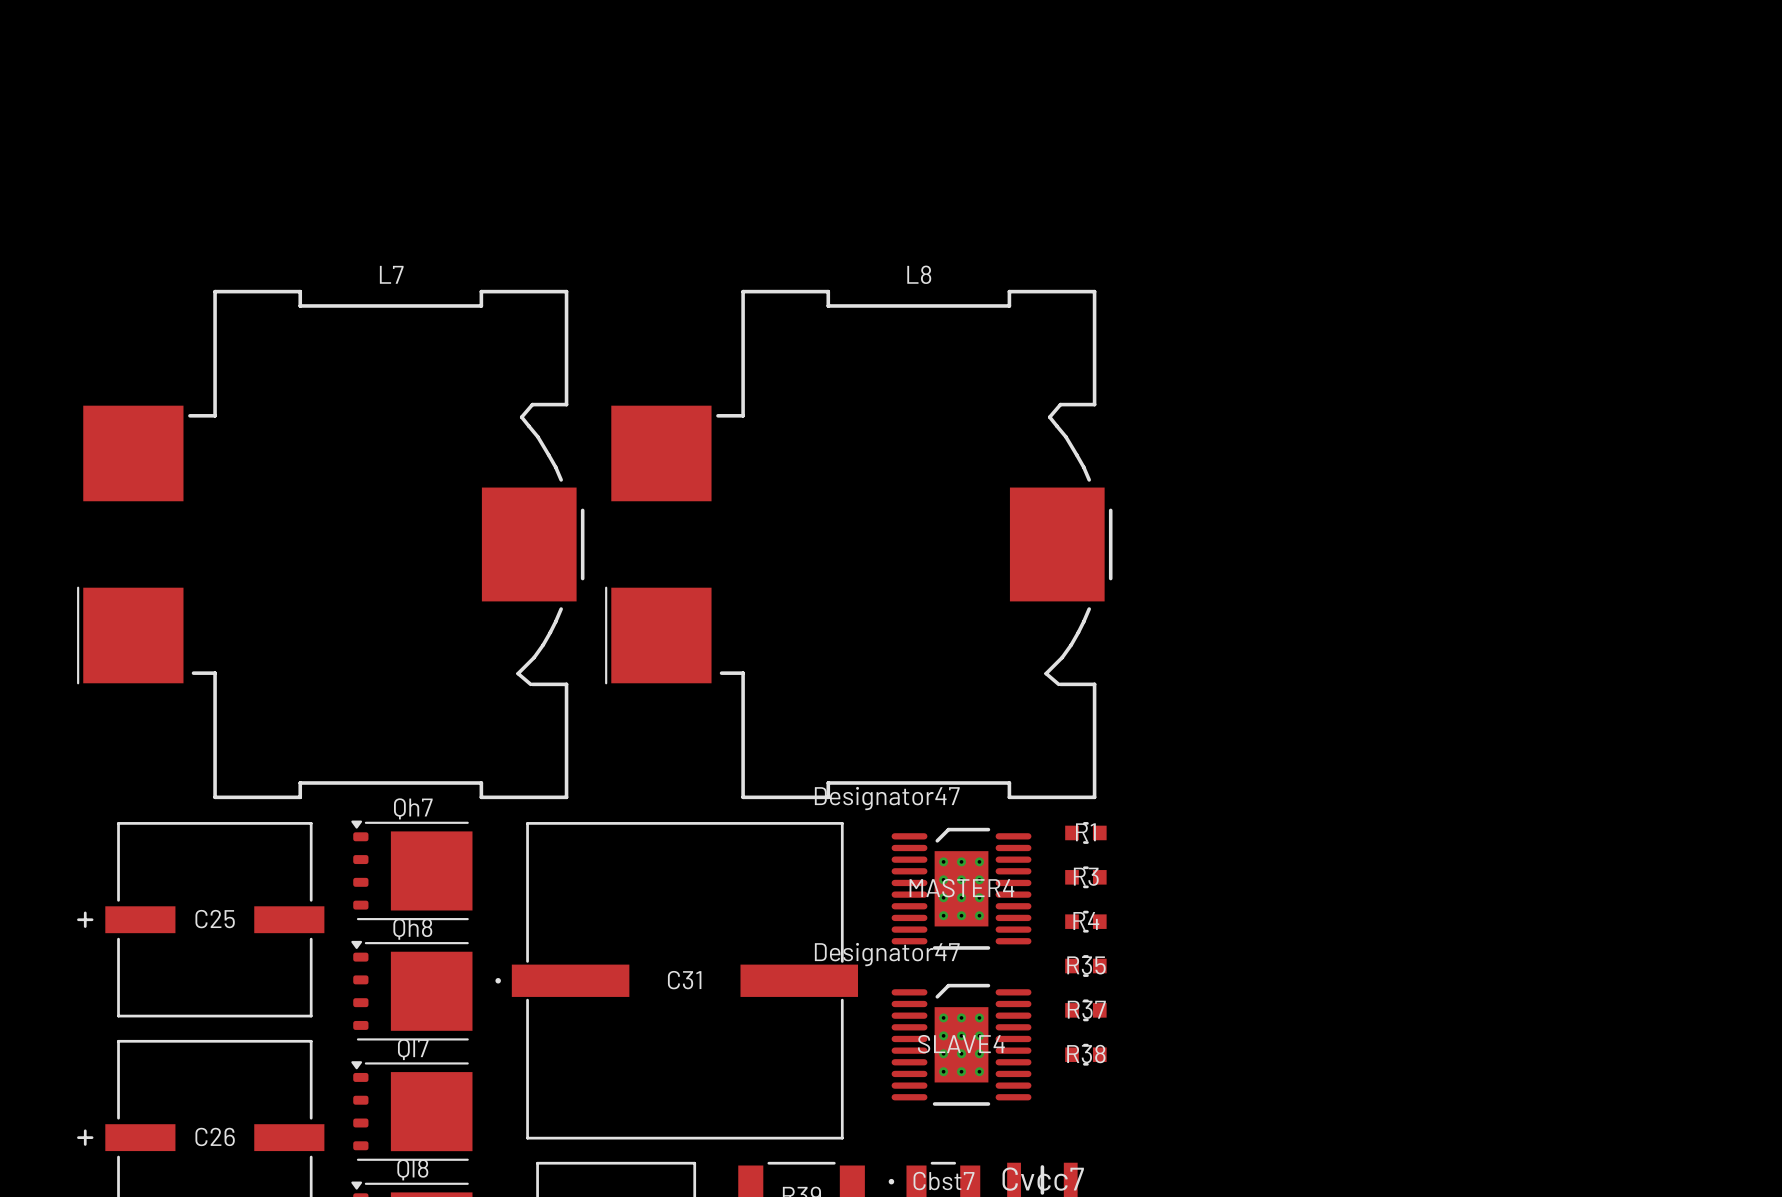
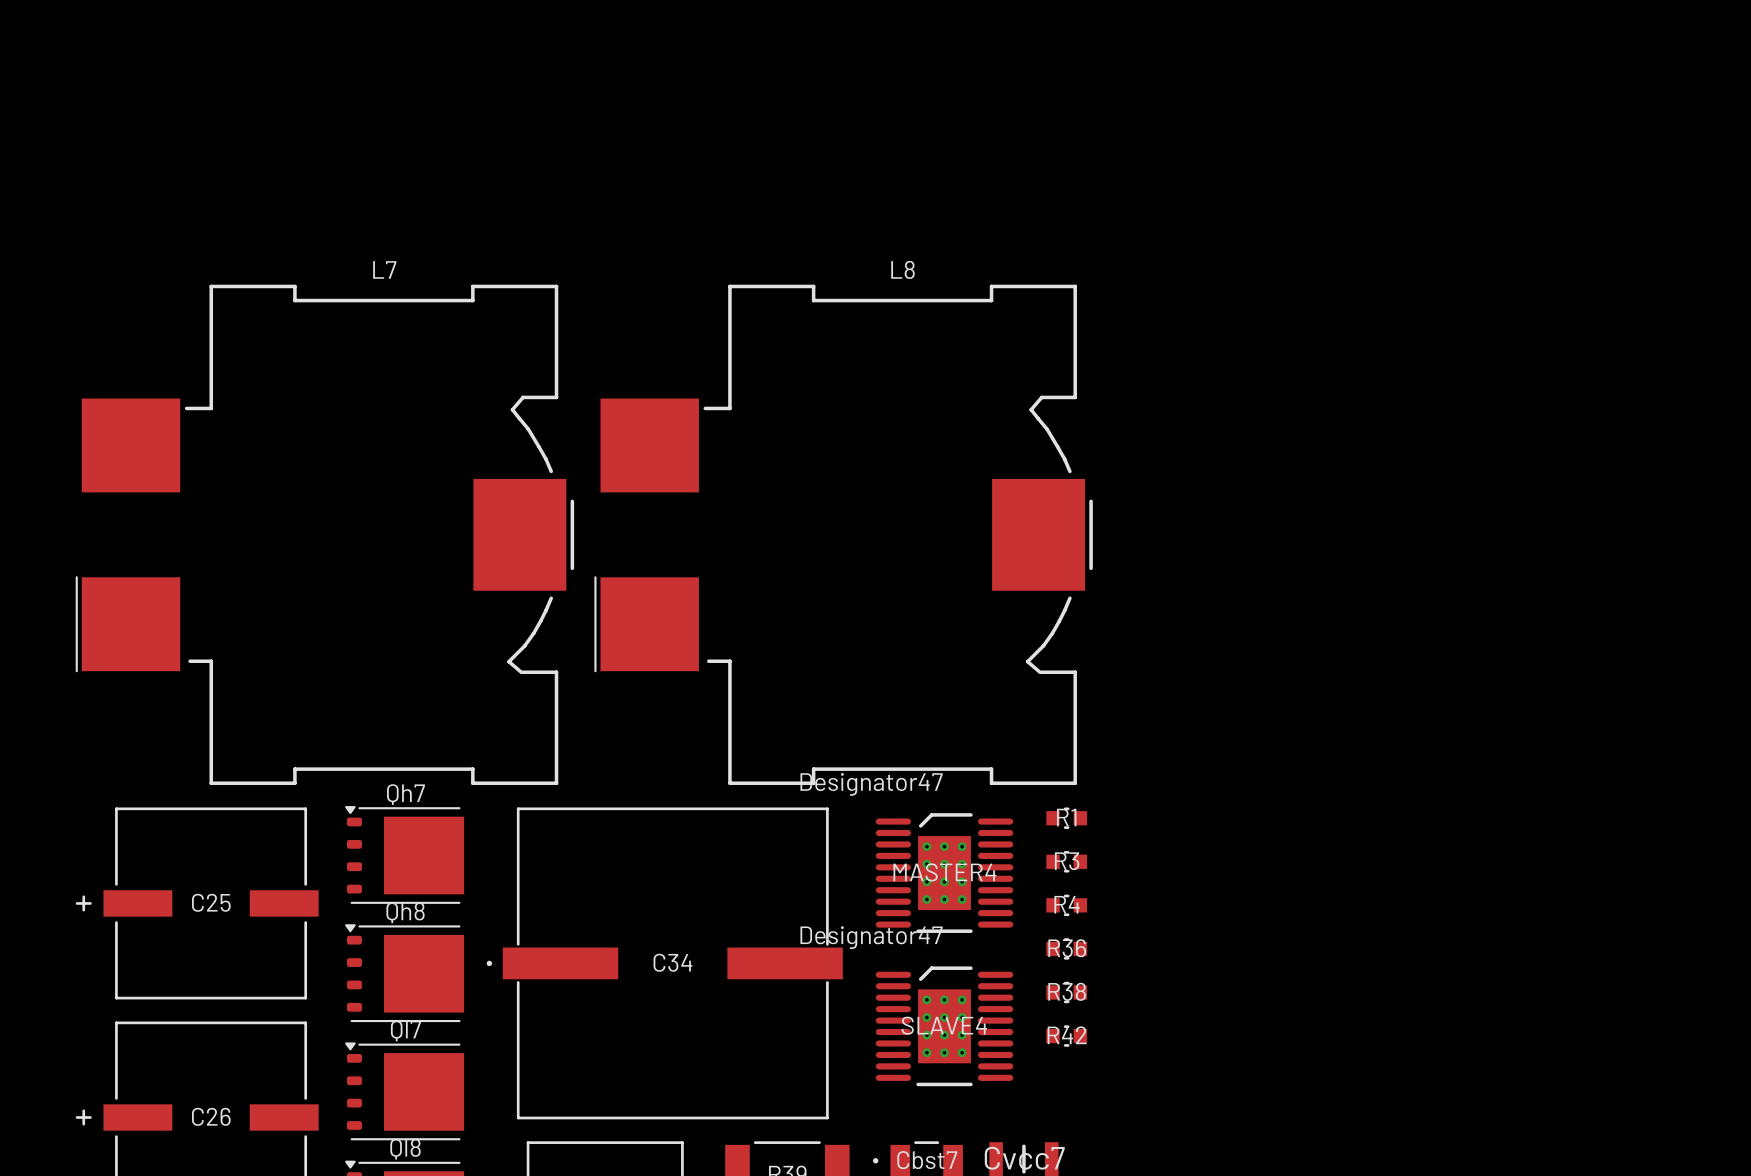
R35 name: R35 (1086, 965) -> R36 (1067, 948)
C31 name: C31 (684, 980) -> C34 (672, 962)
R37 name: R37 (1086, 1009) -> R38 (1067, 991)
R38 name: R38 (1086, 1054) -> R42 (1067, 1035)

